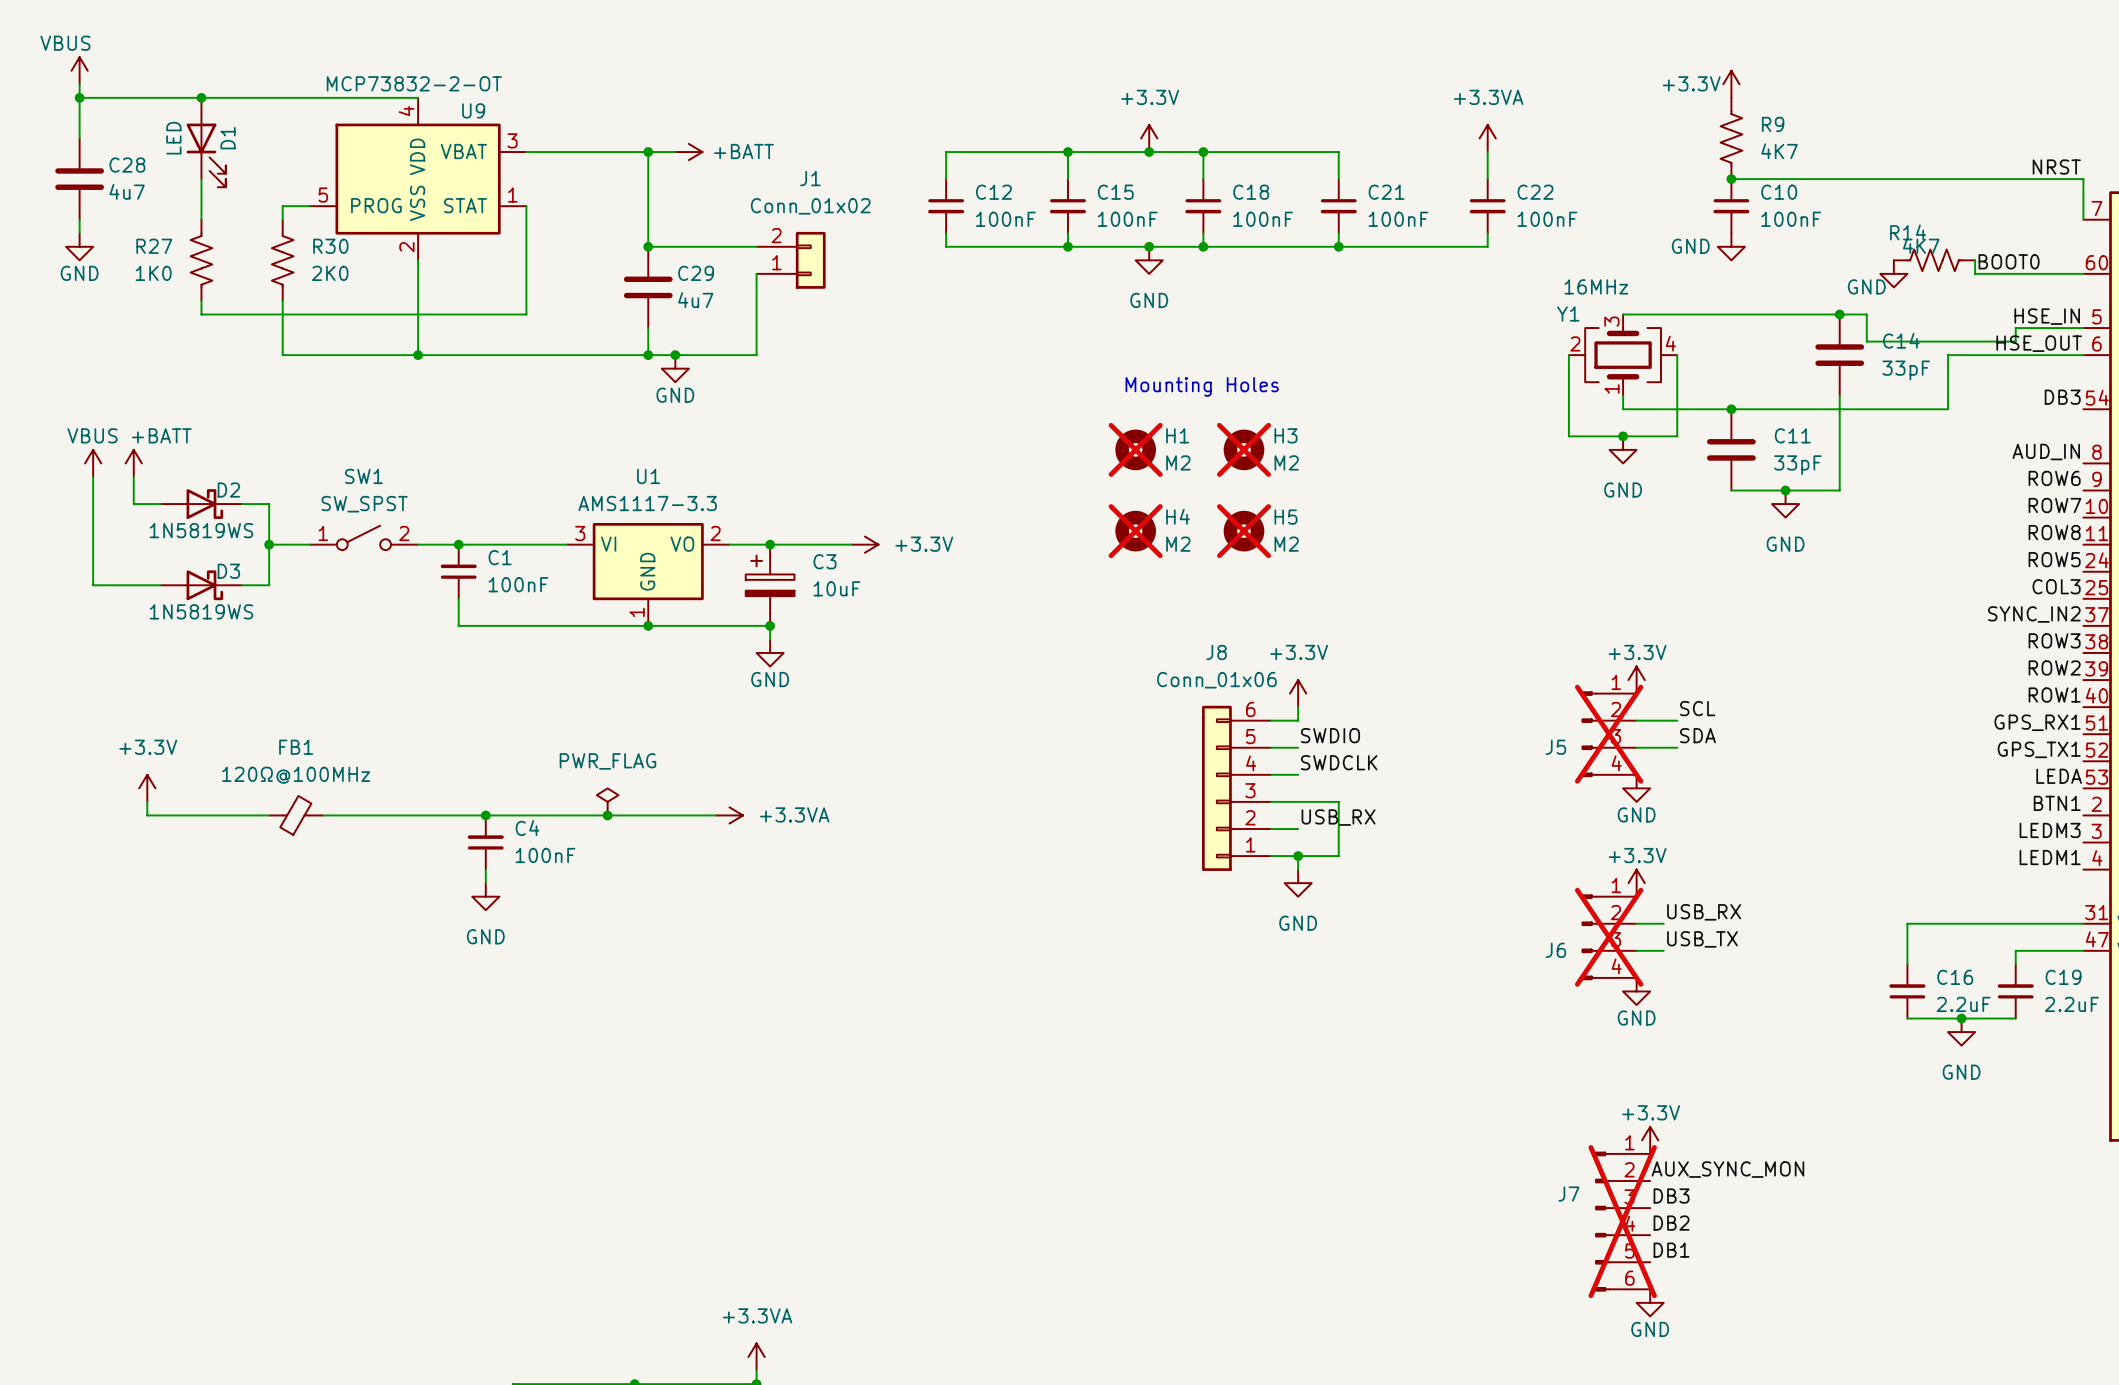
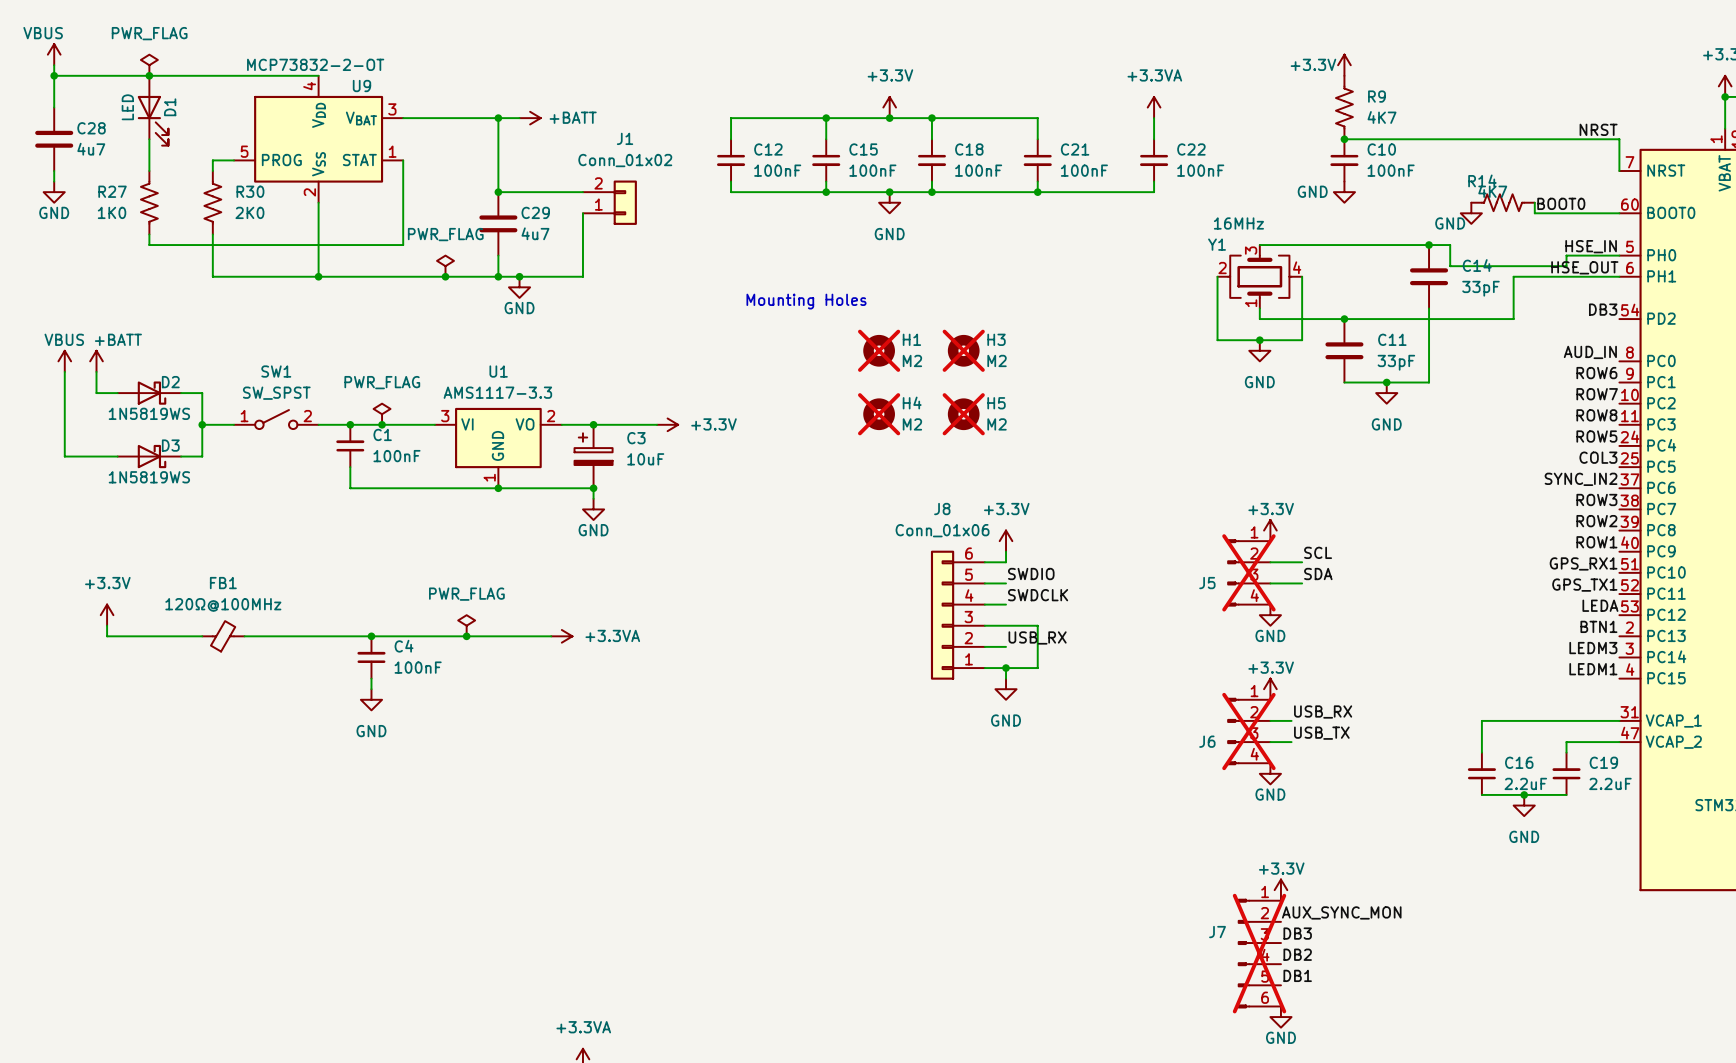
power symbol: none -> PWR_FLAG (149, 65)
U9 symbol: [309, 97, 527, 261] -> [233, 75, 404, 203]
power symbol: none -> PWR_FLAG (445, 266)
junction: none -> (445, 276)
text position: Mounting Holes (1202, 386) -> Mounting Holes (806, 301)
power symbol: none -> PWR_FLAG (382, 414)
junction: none -> (382, 424)

